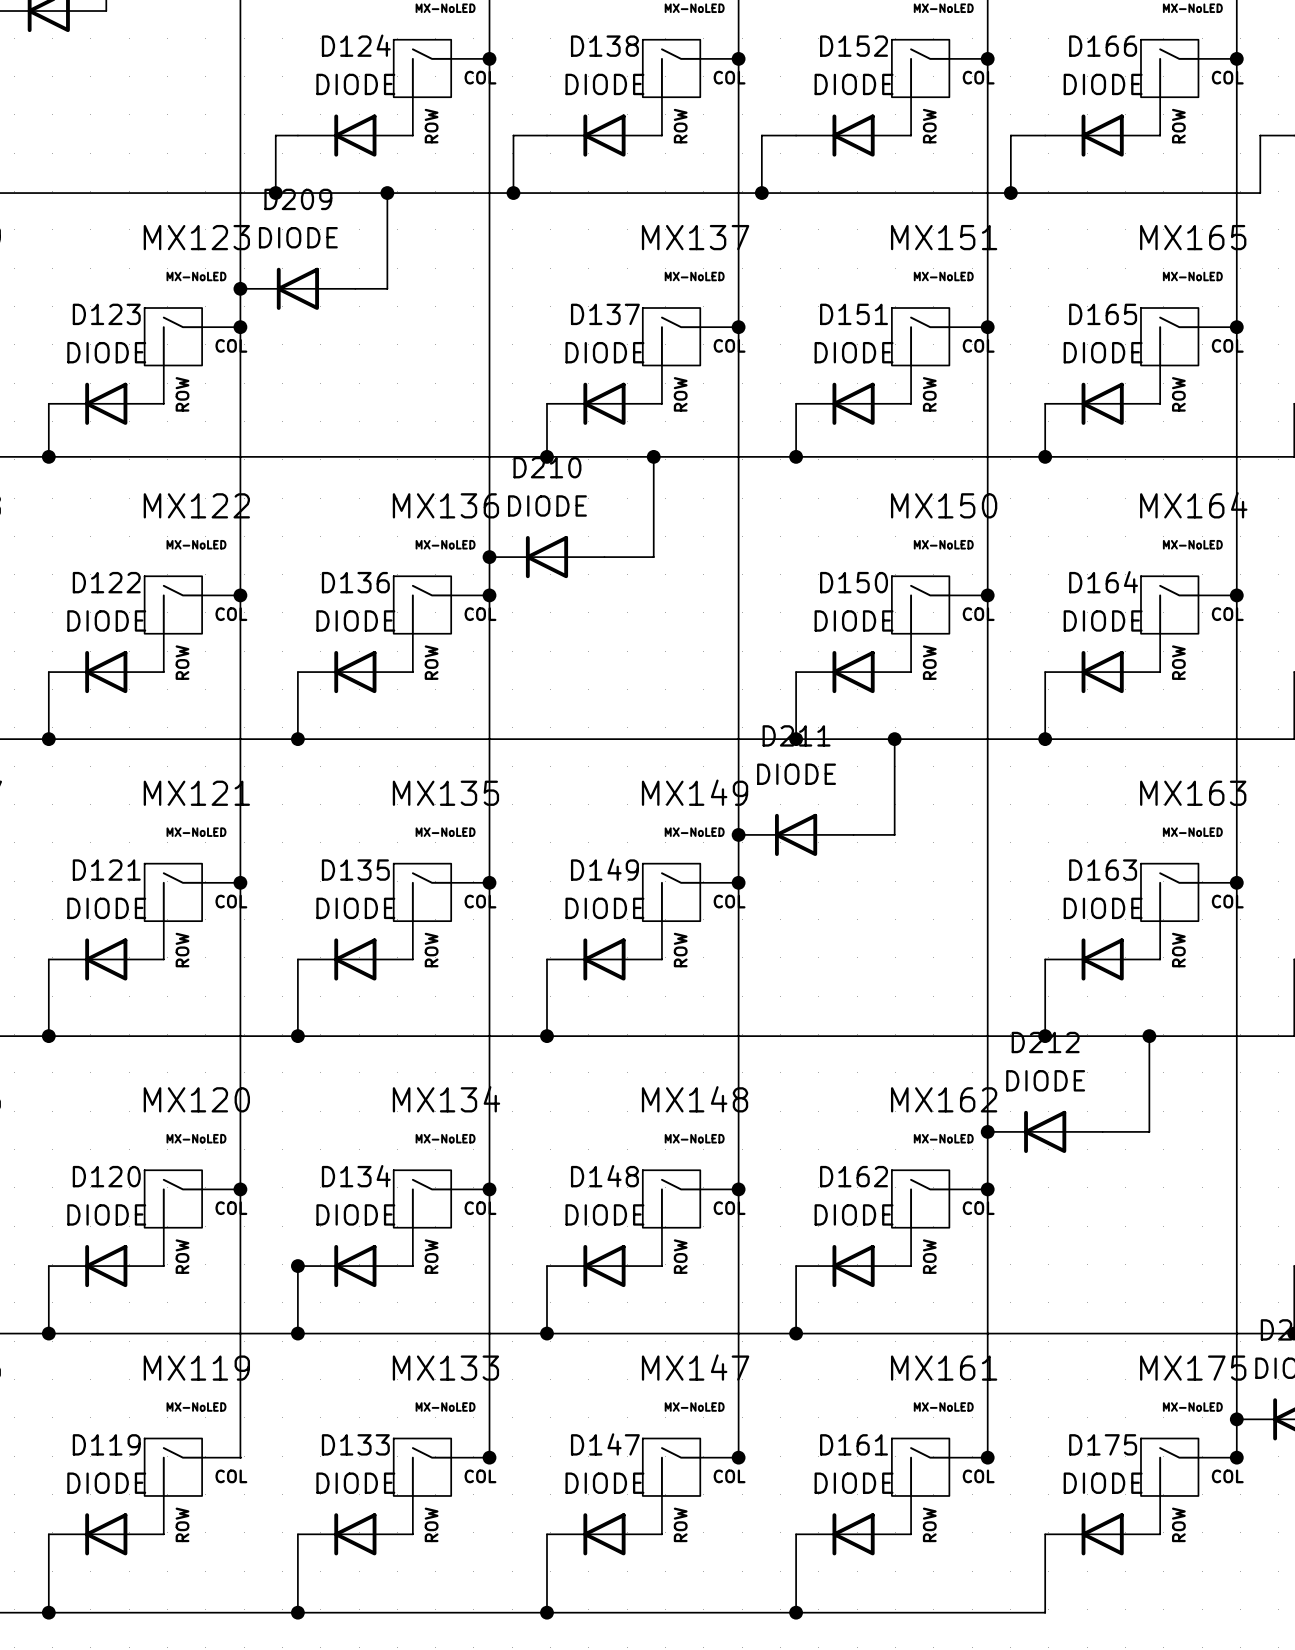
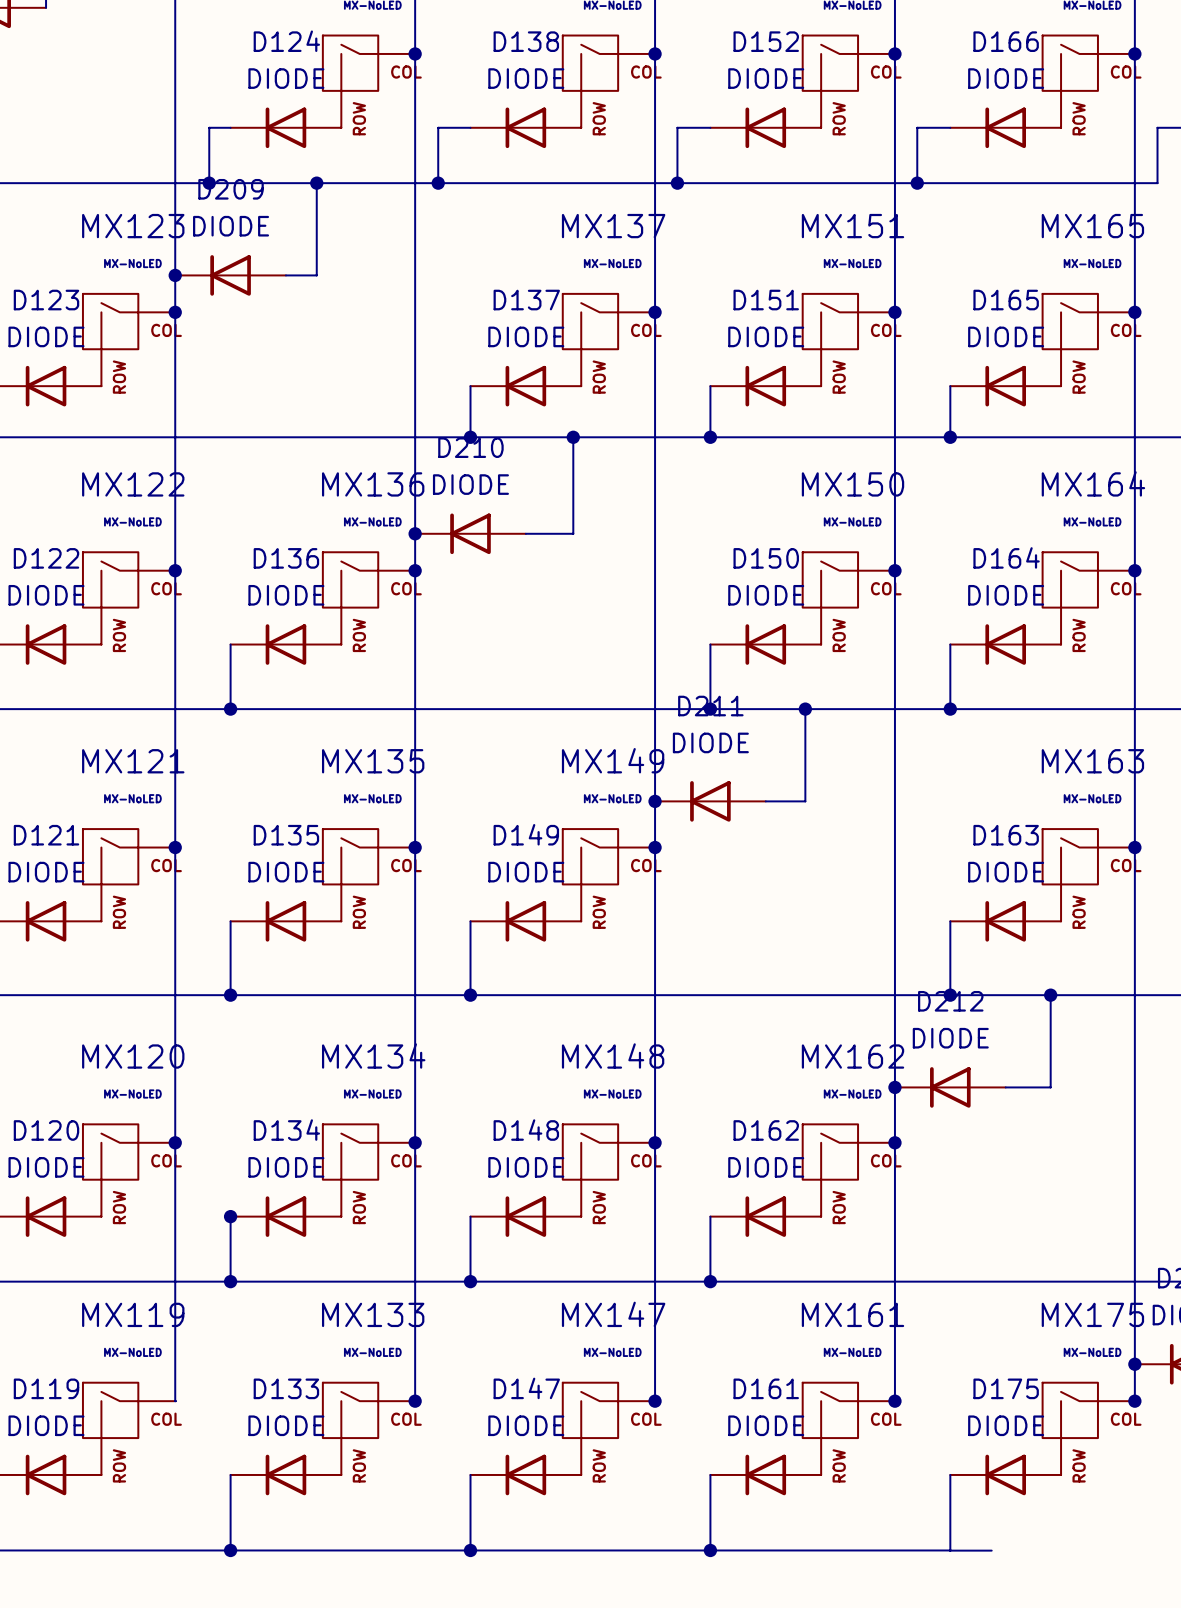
wire: none -> (950, 1550) (991, 1550)

